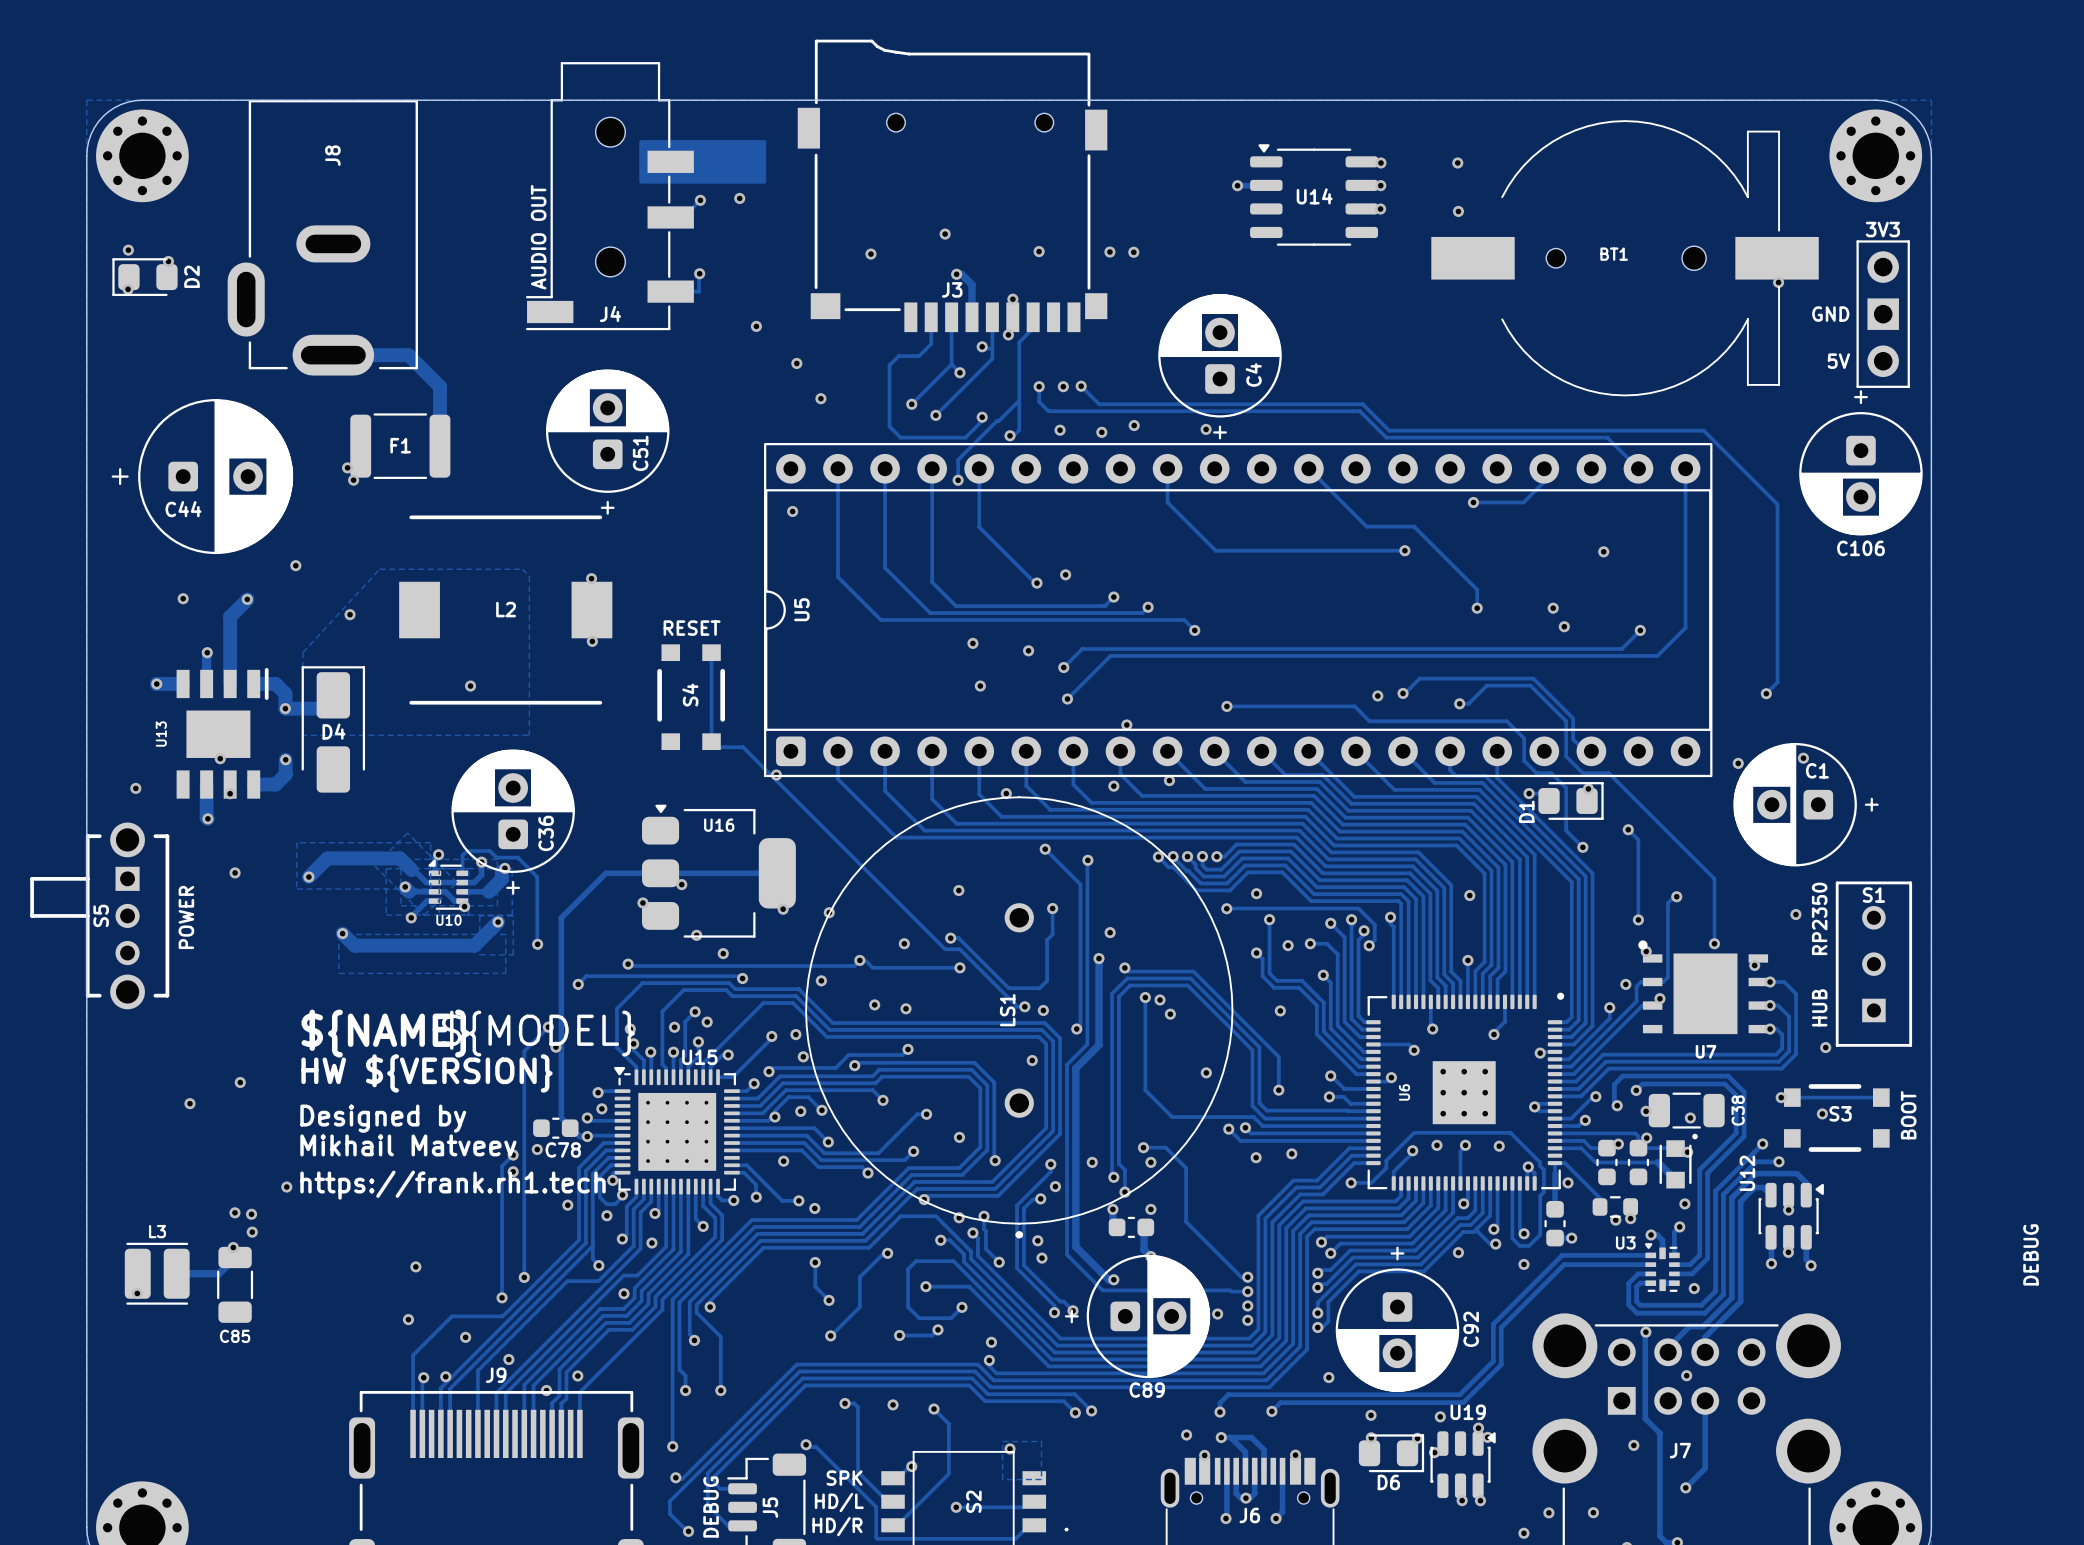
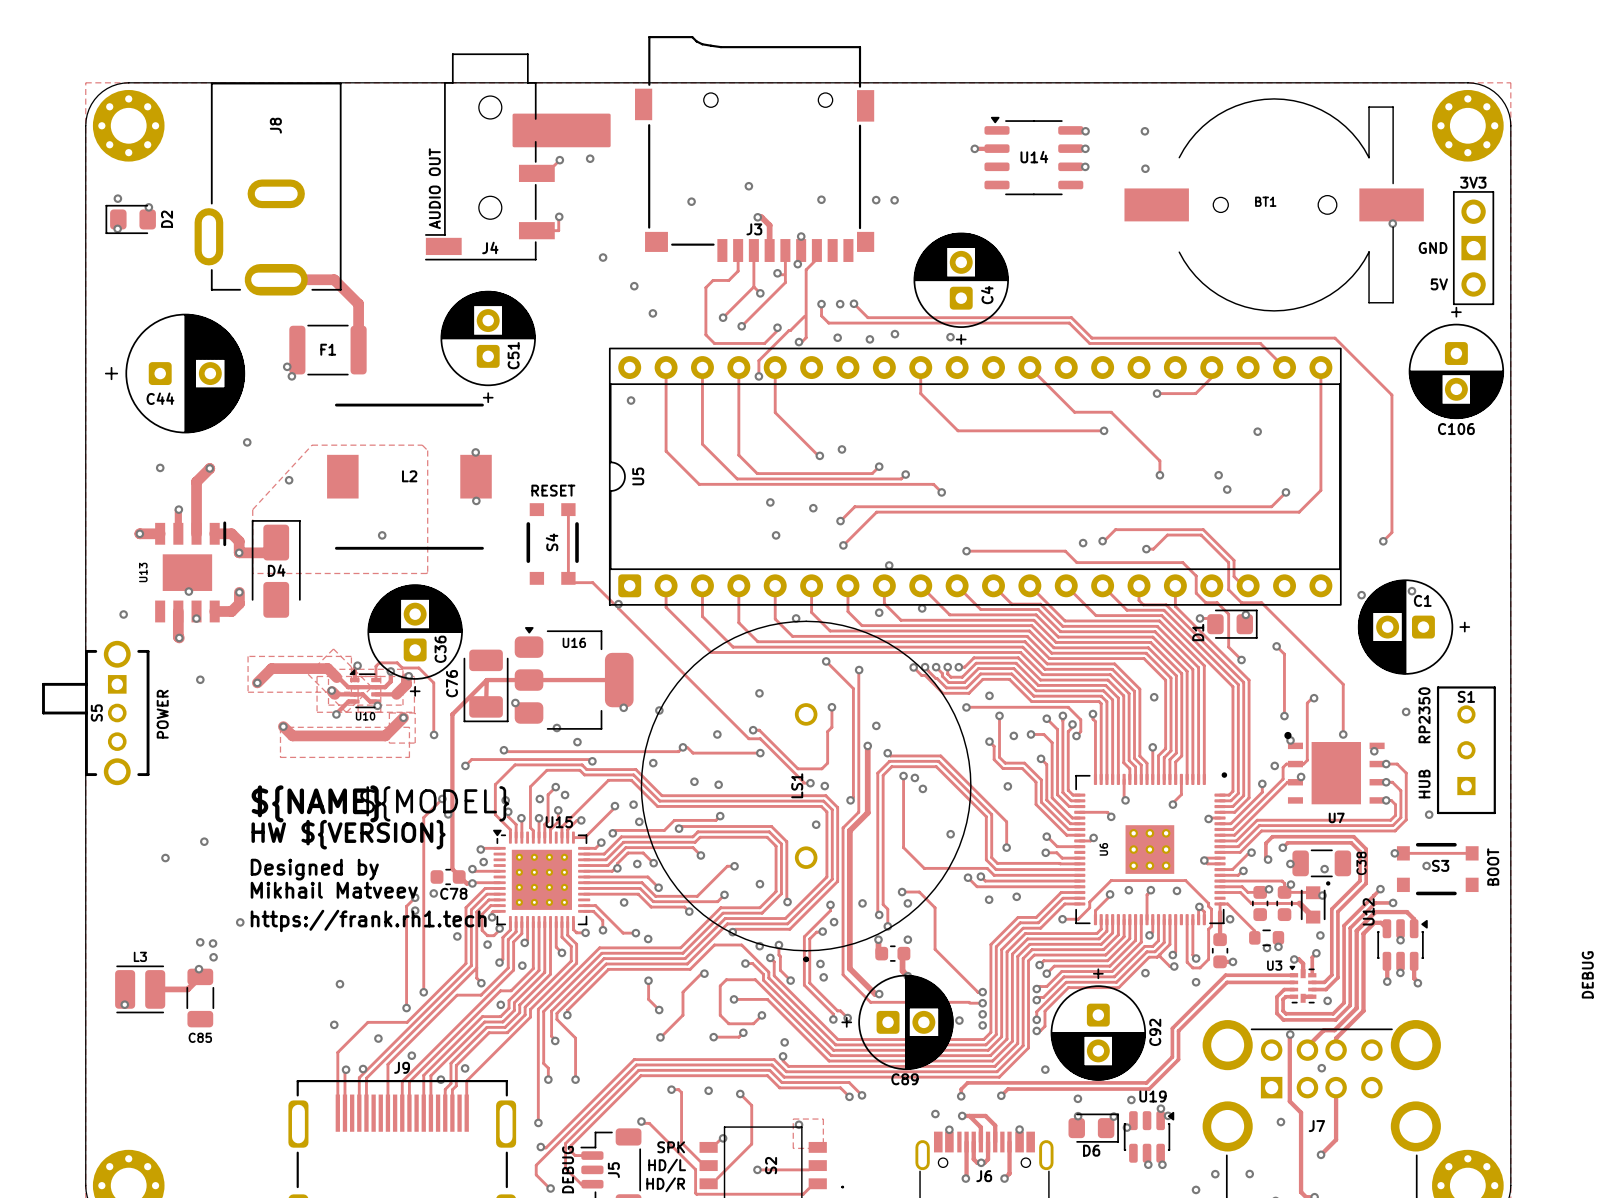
track: none -> (486, 680) (486, 706)
C76: none -> (486, 685)
via: (681, 884) -> none

